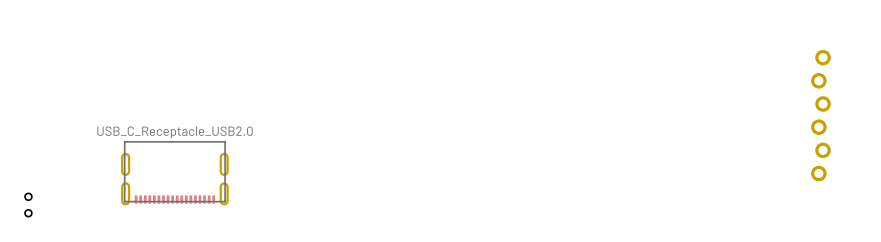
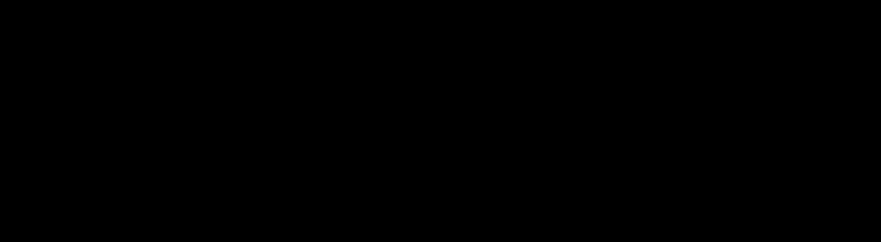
part: (820, 115) -> none
part: USB_C_Receptacle_USB2.0 (174, 173) -> none
part: (28, 205) -> none

